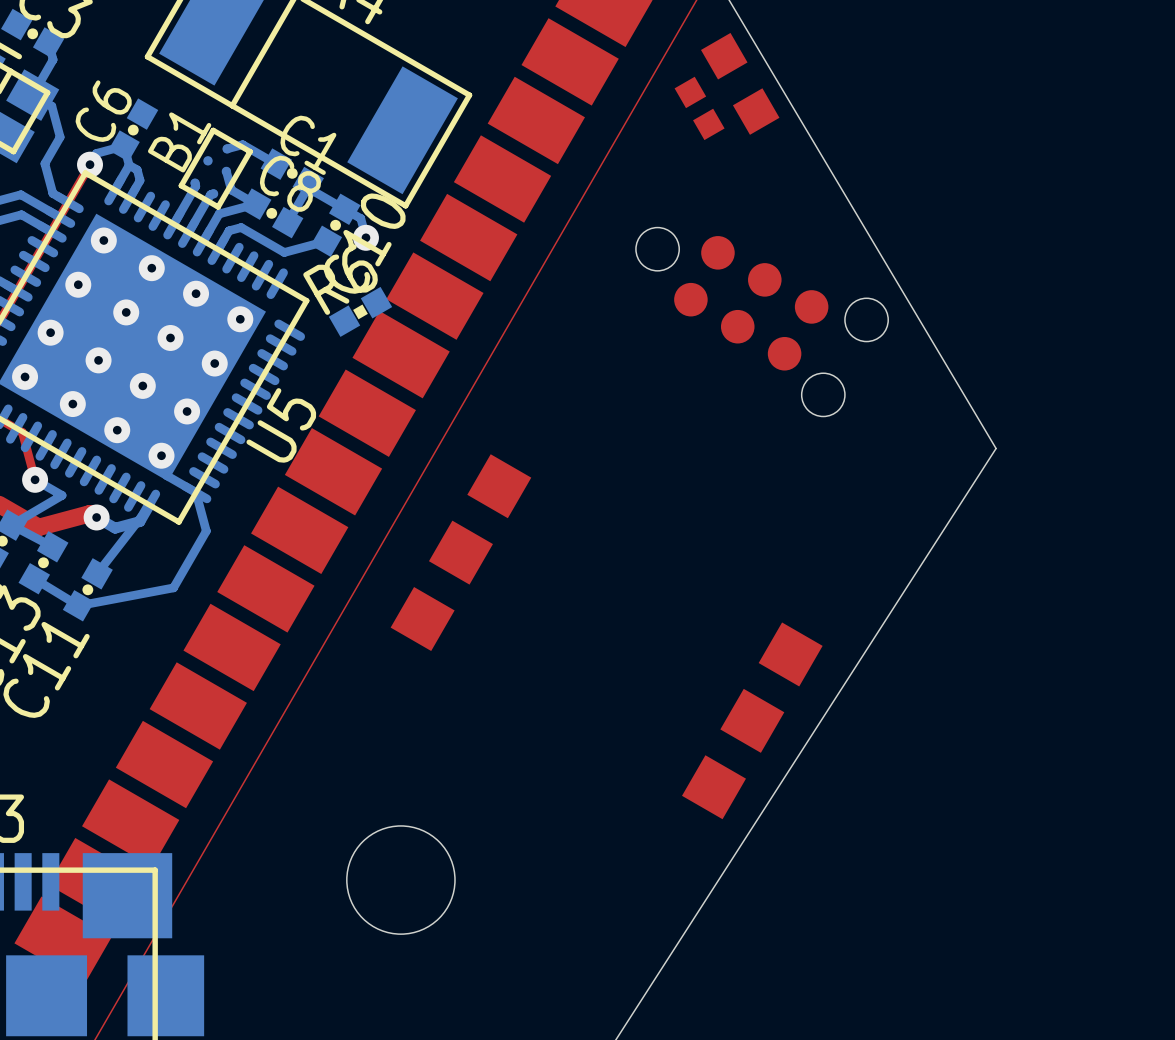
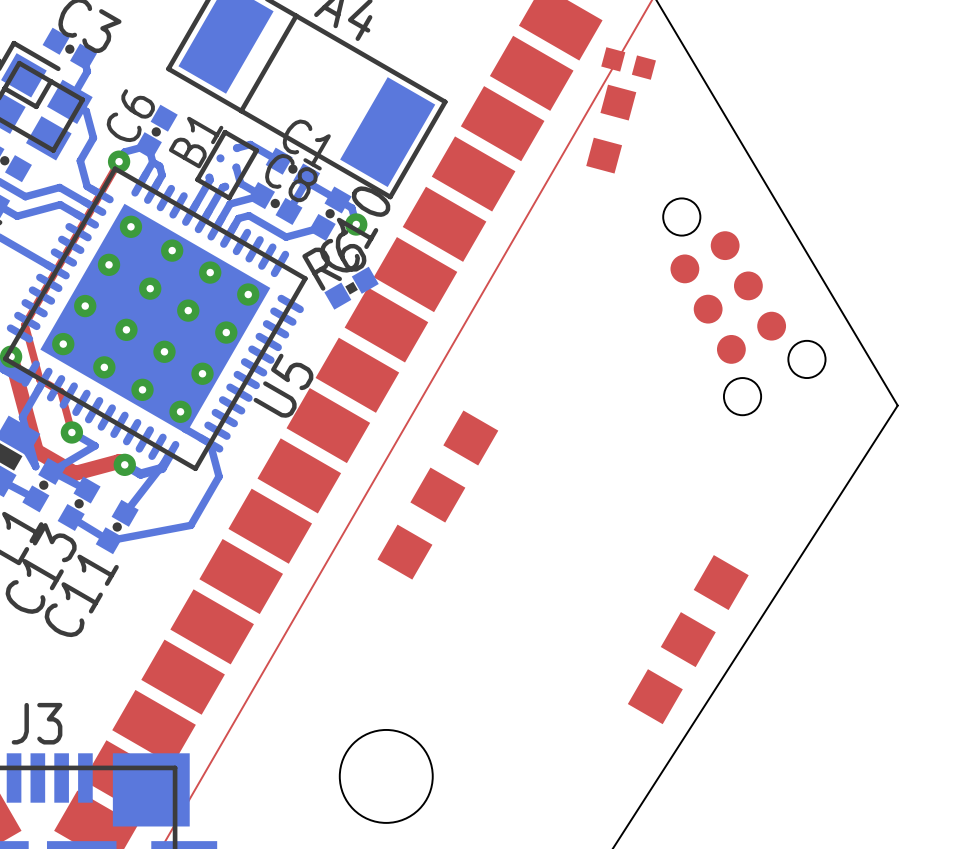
part: none -> (628, 63)
part: (740, 83) -> none
part: (699, 108) -> none
part: none -> (611, 129)
part: (762, 322) -> none
part: none -> (744, 306)

